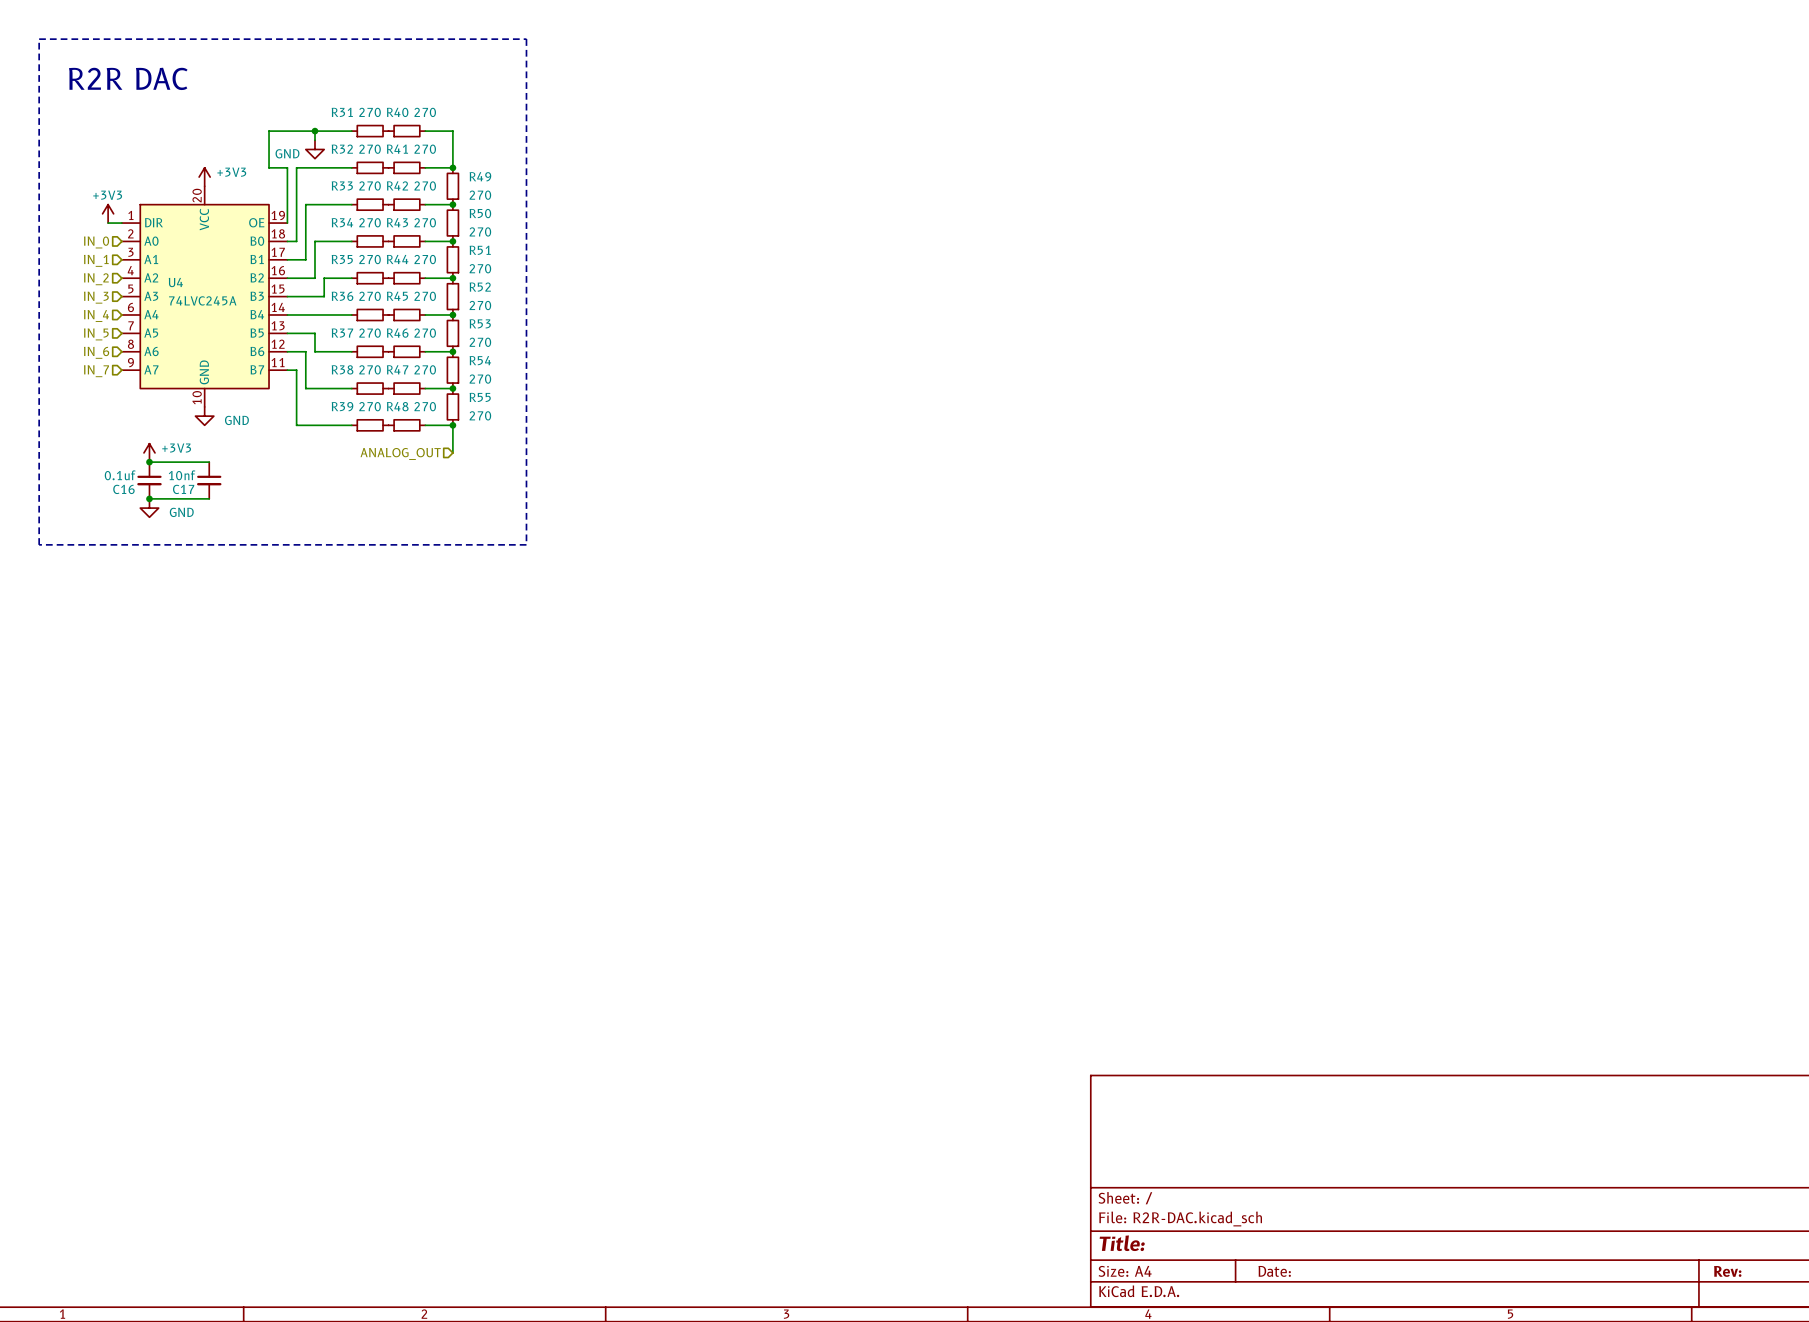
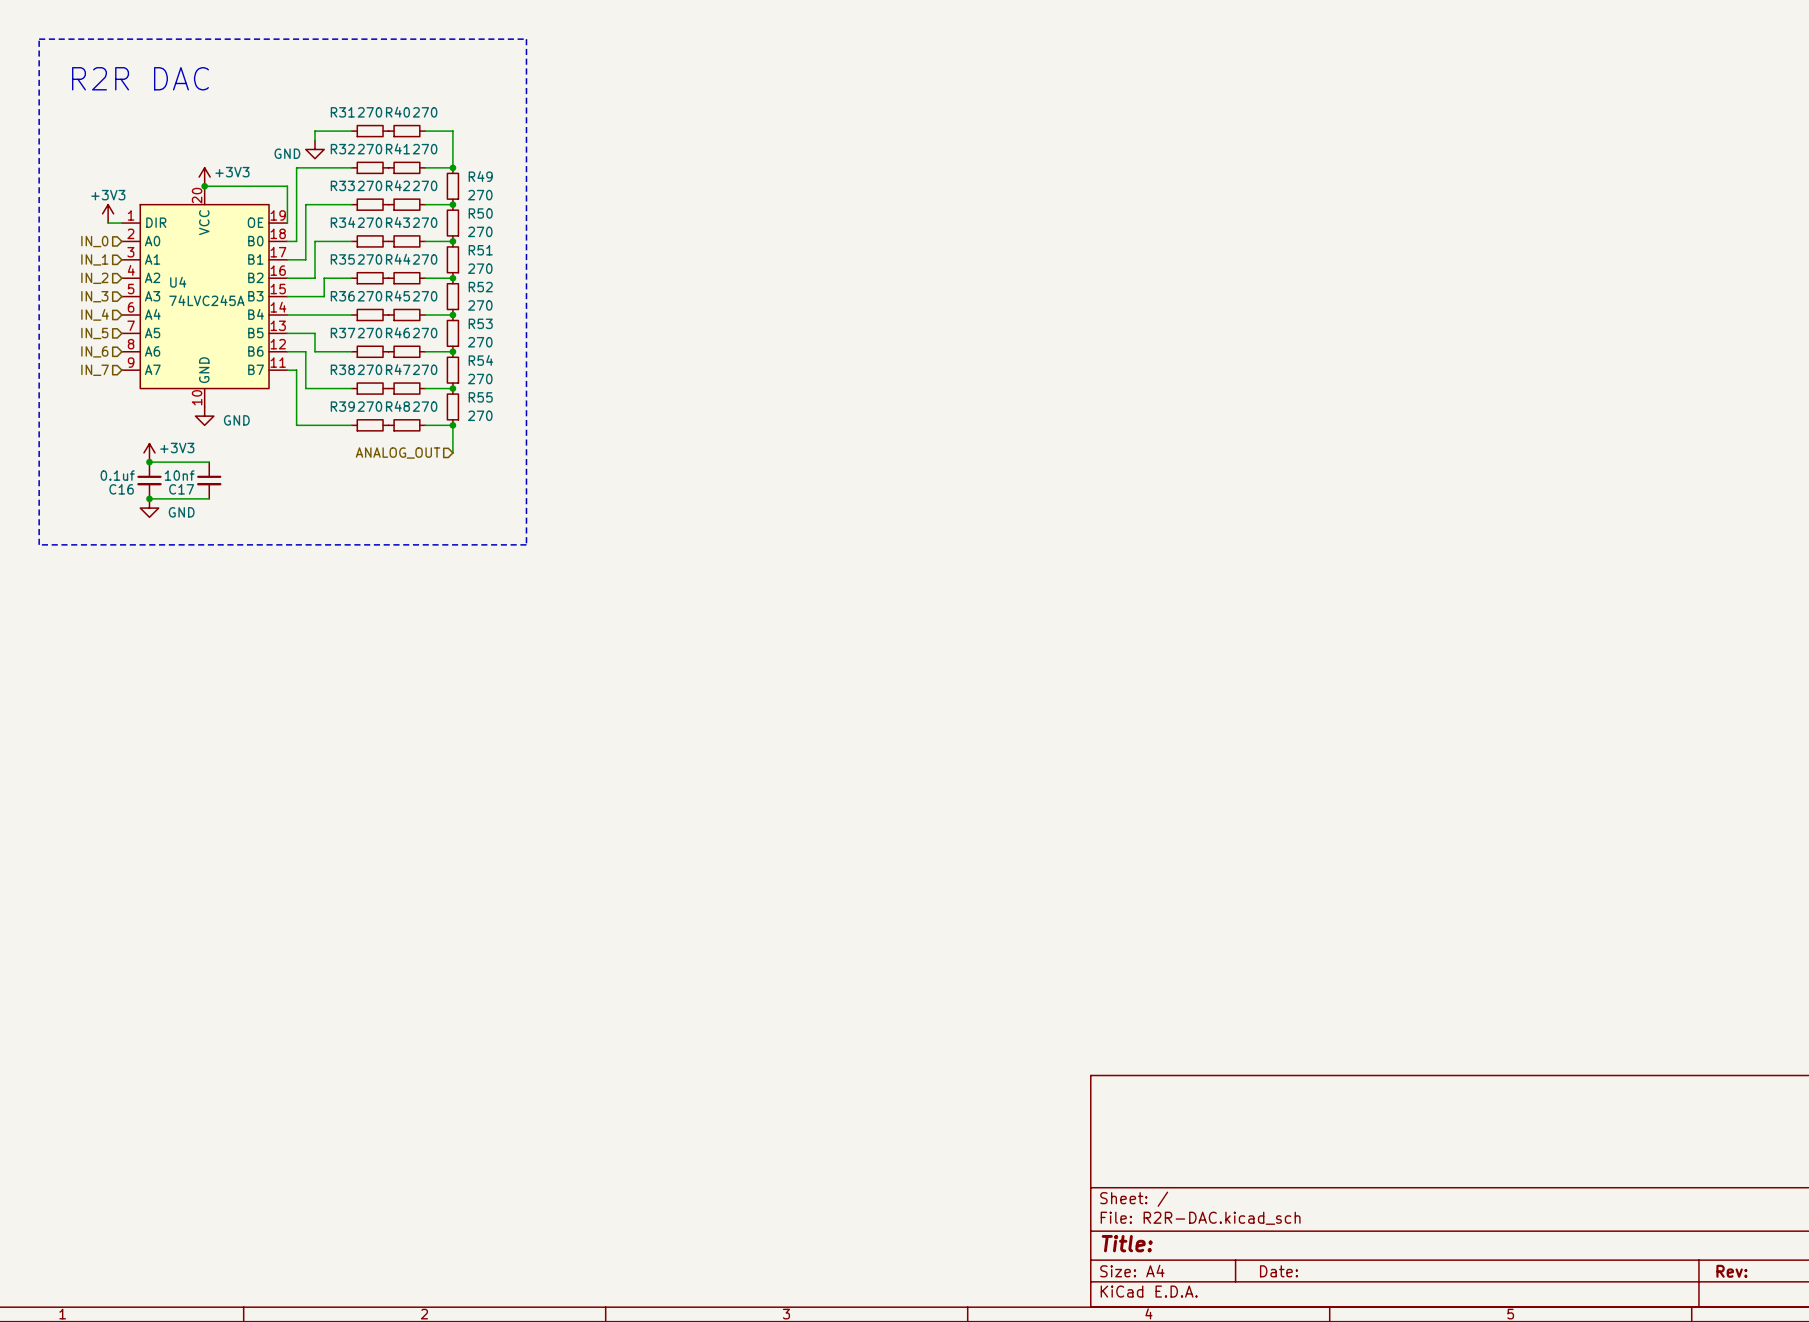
wire: (314, 131) (269, 131) (269, 167) (287, 167) (287, 186) -> (204, 186) (287, 186)
junction: (314, 131) -> none
junction: none -> (204, 186)

